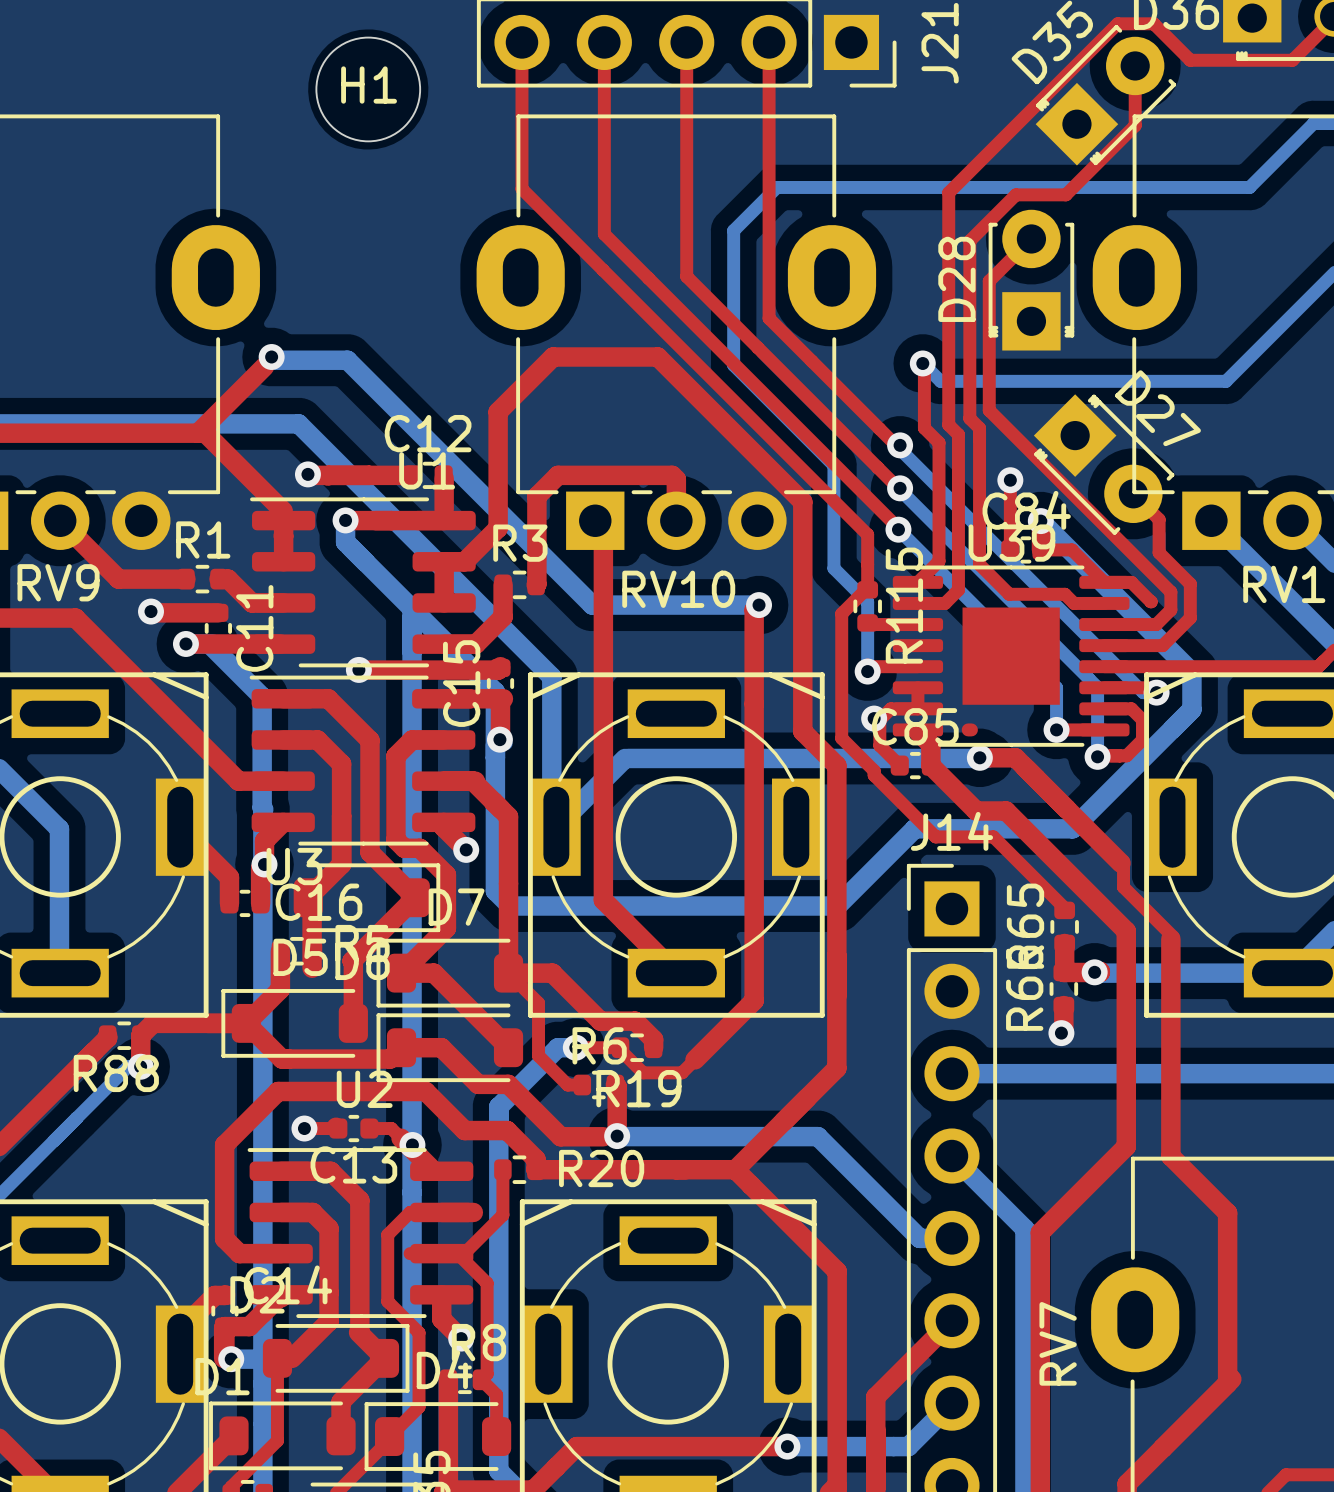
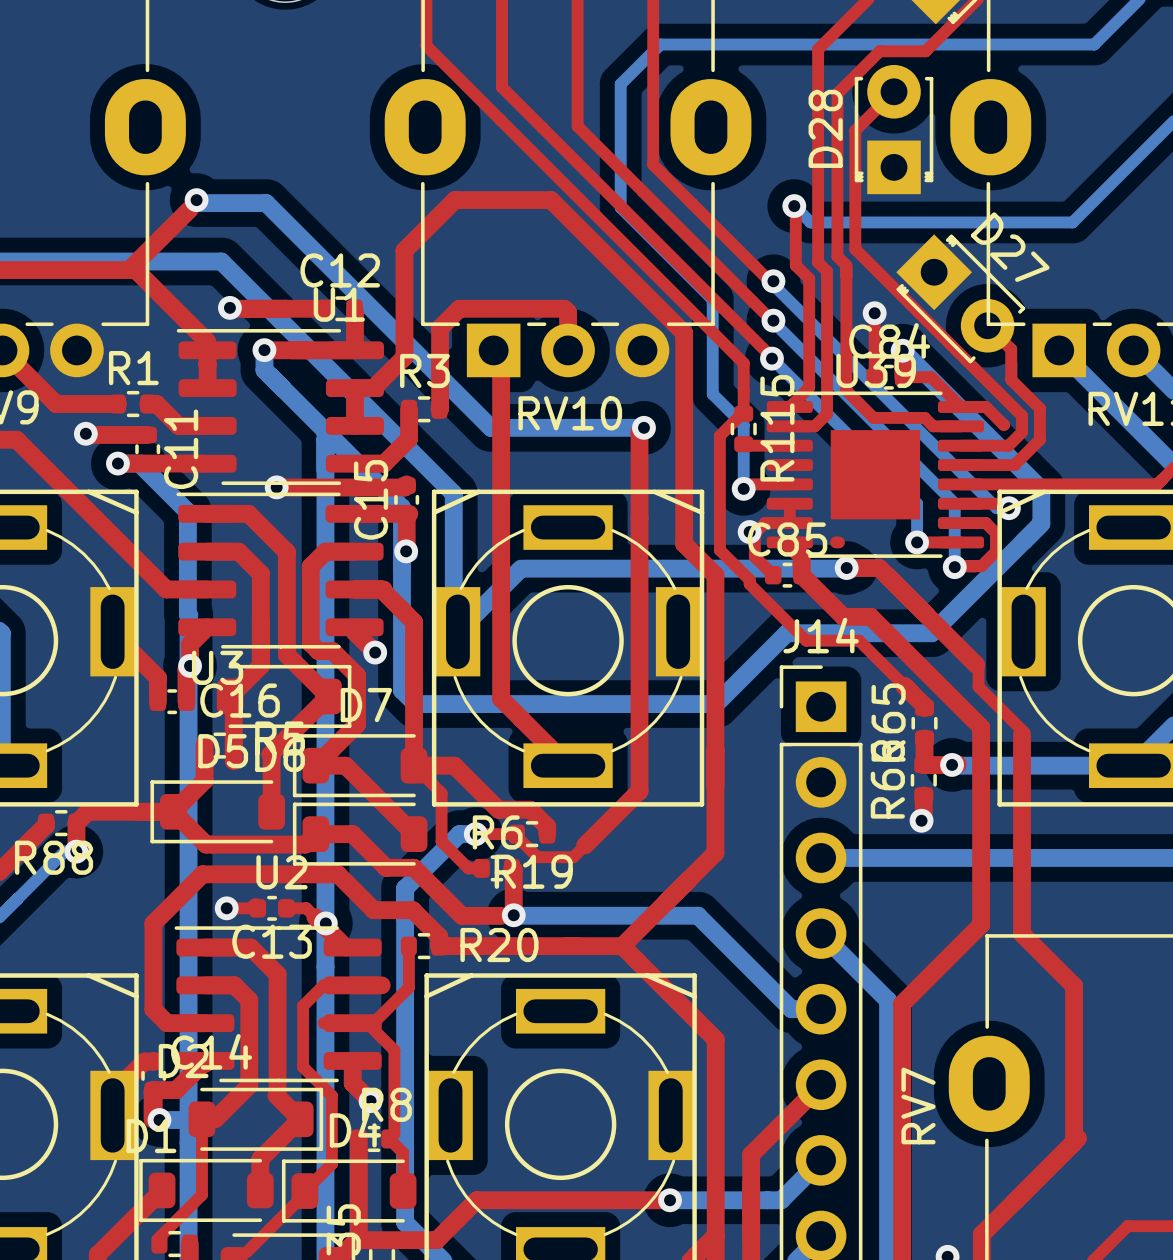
top track width: thin (1042, 886) (1064, 908) (1064, 910) -> thick (904, 685) (924, 708)

